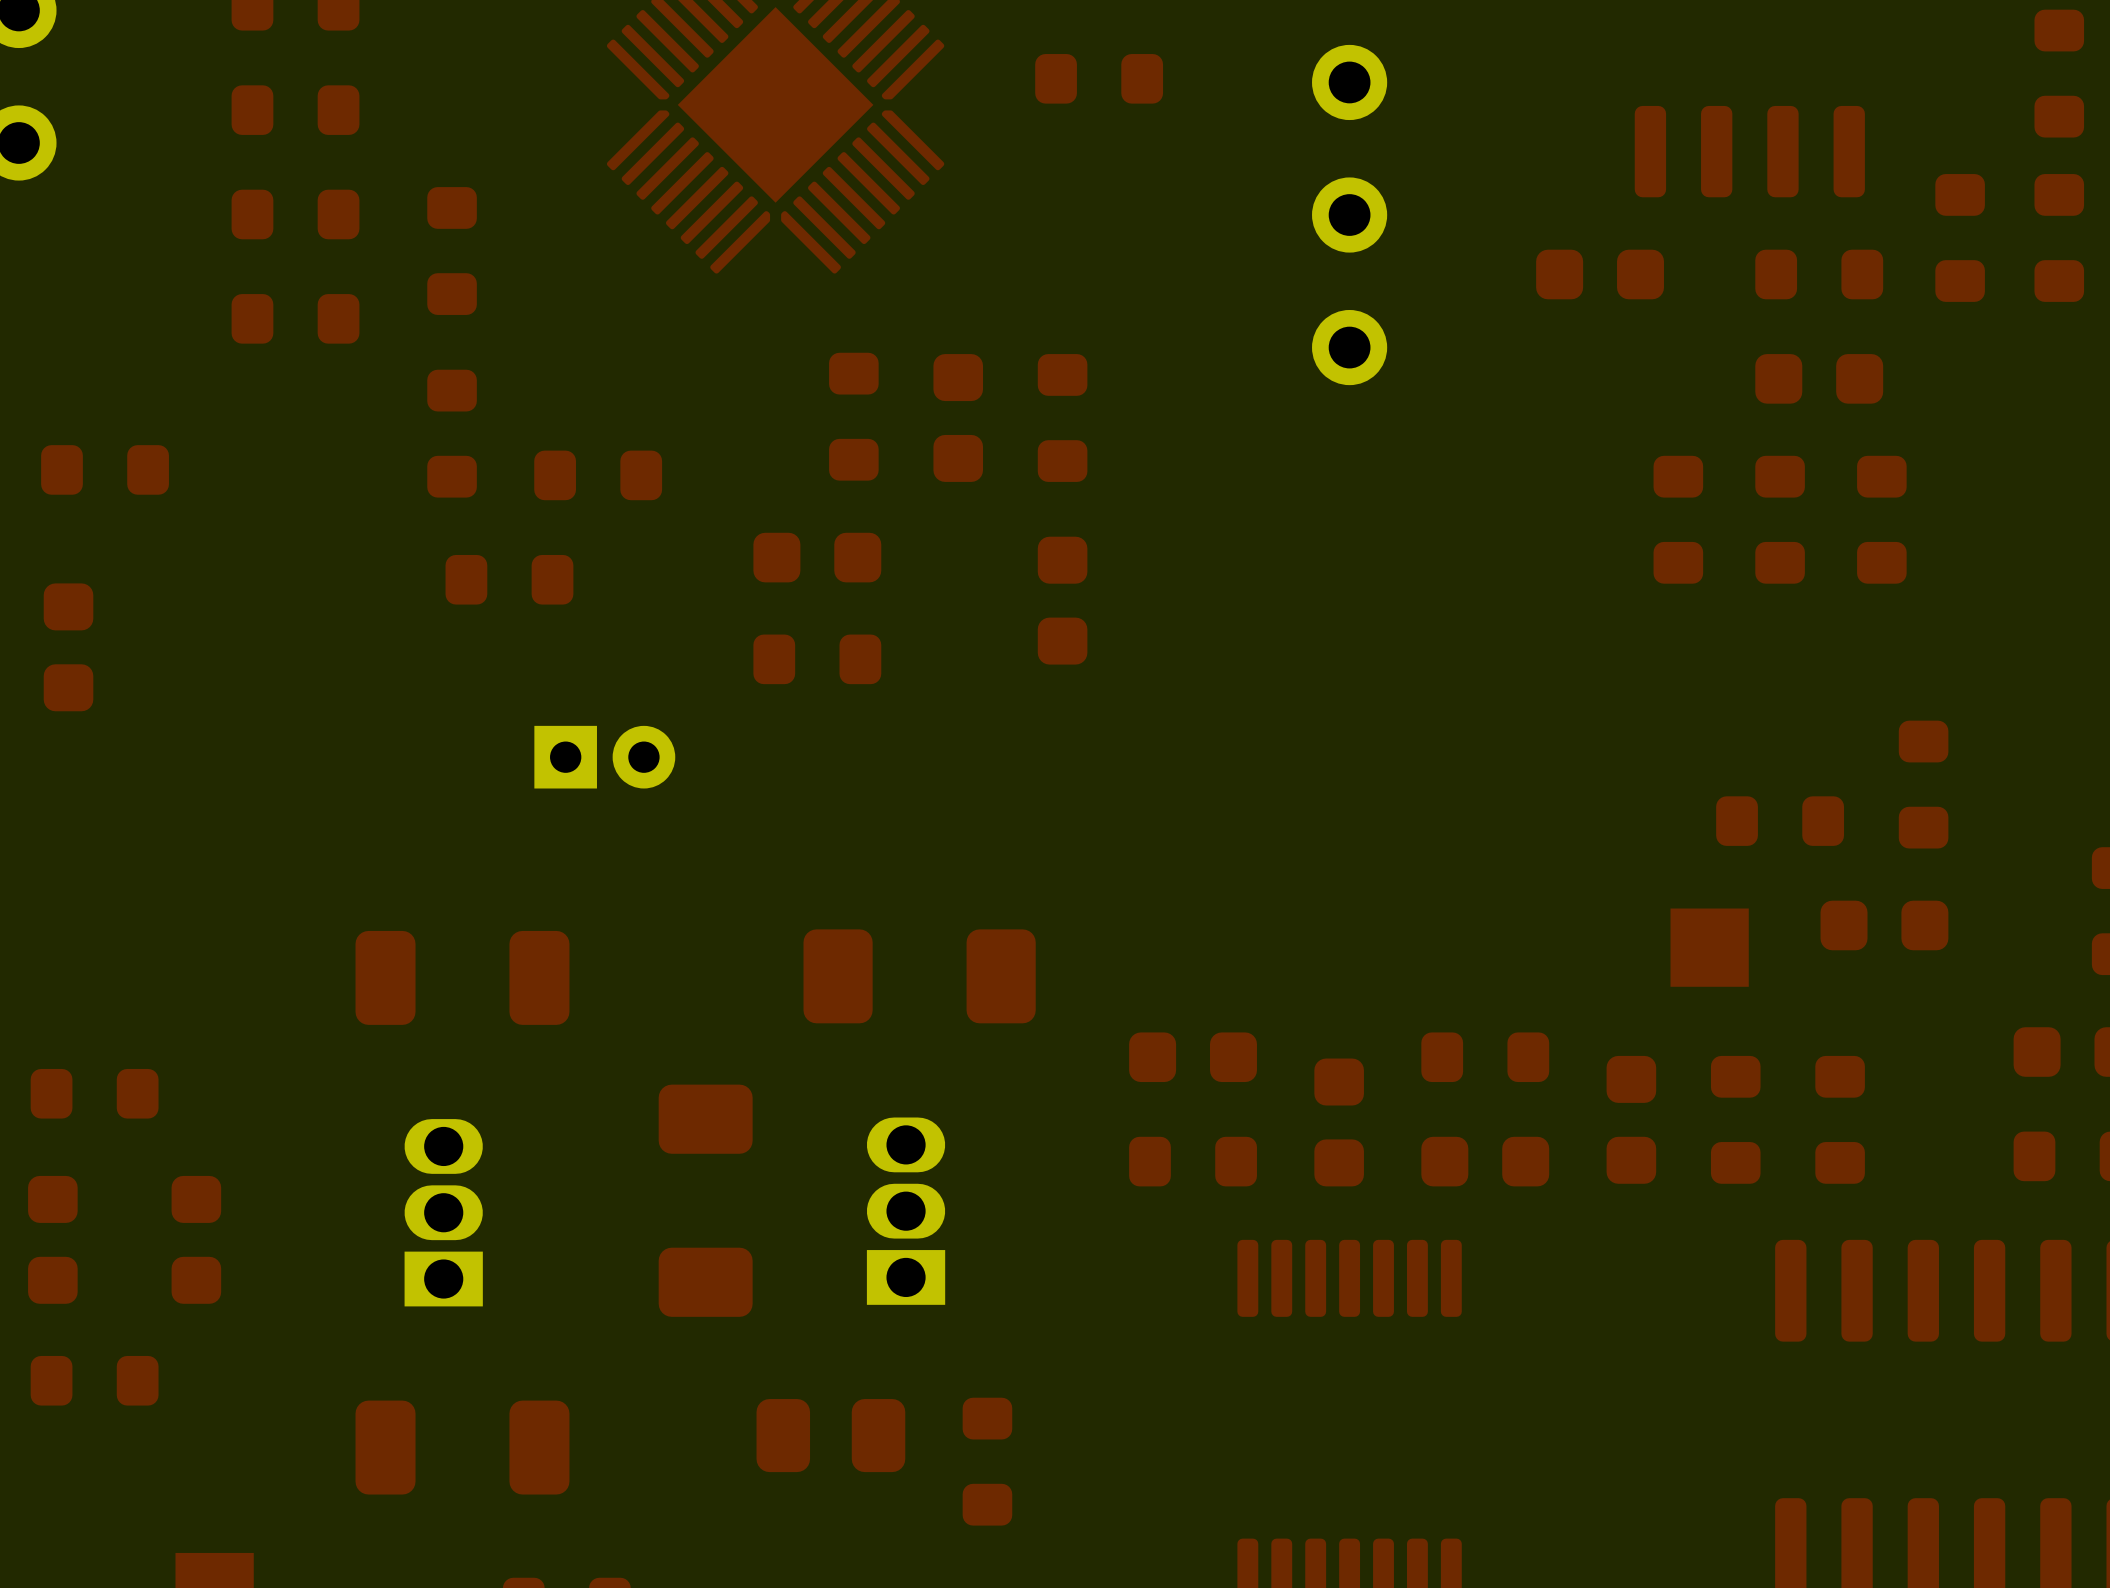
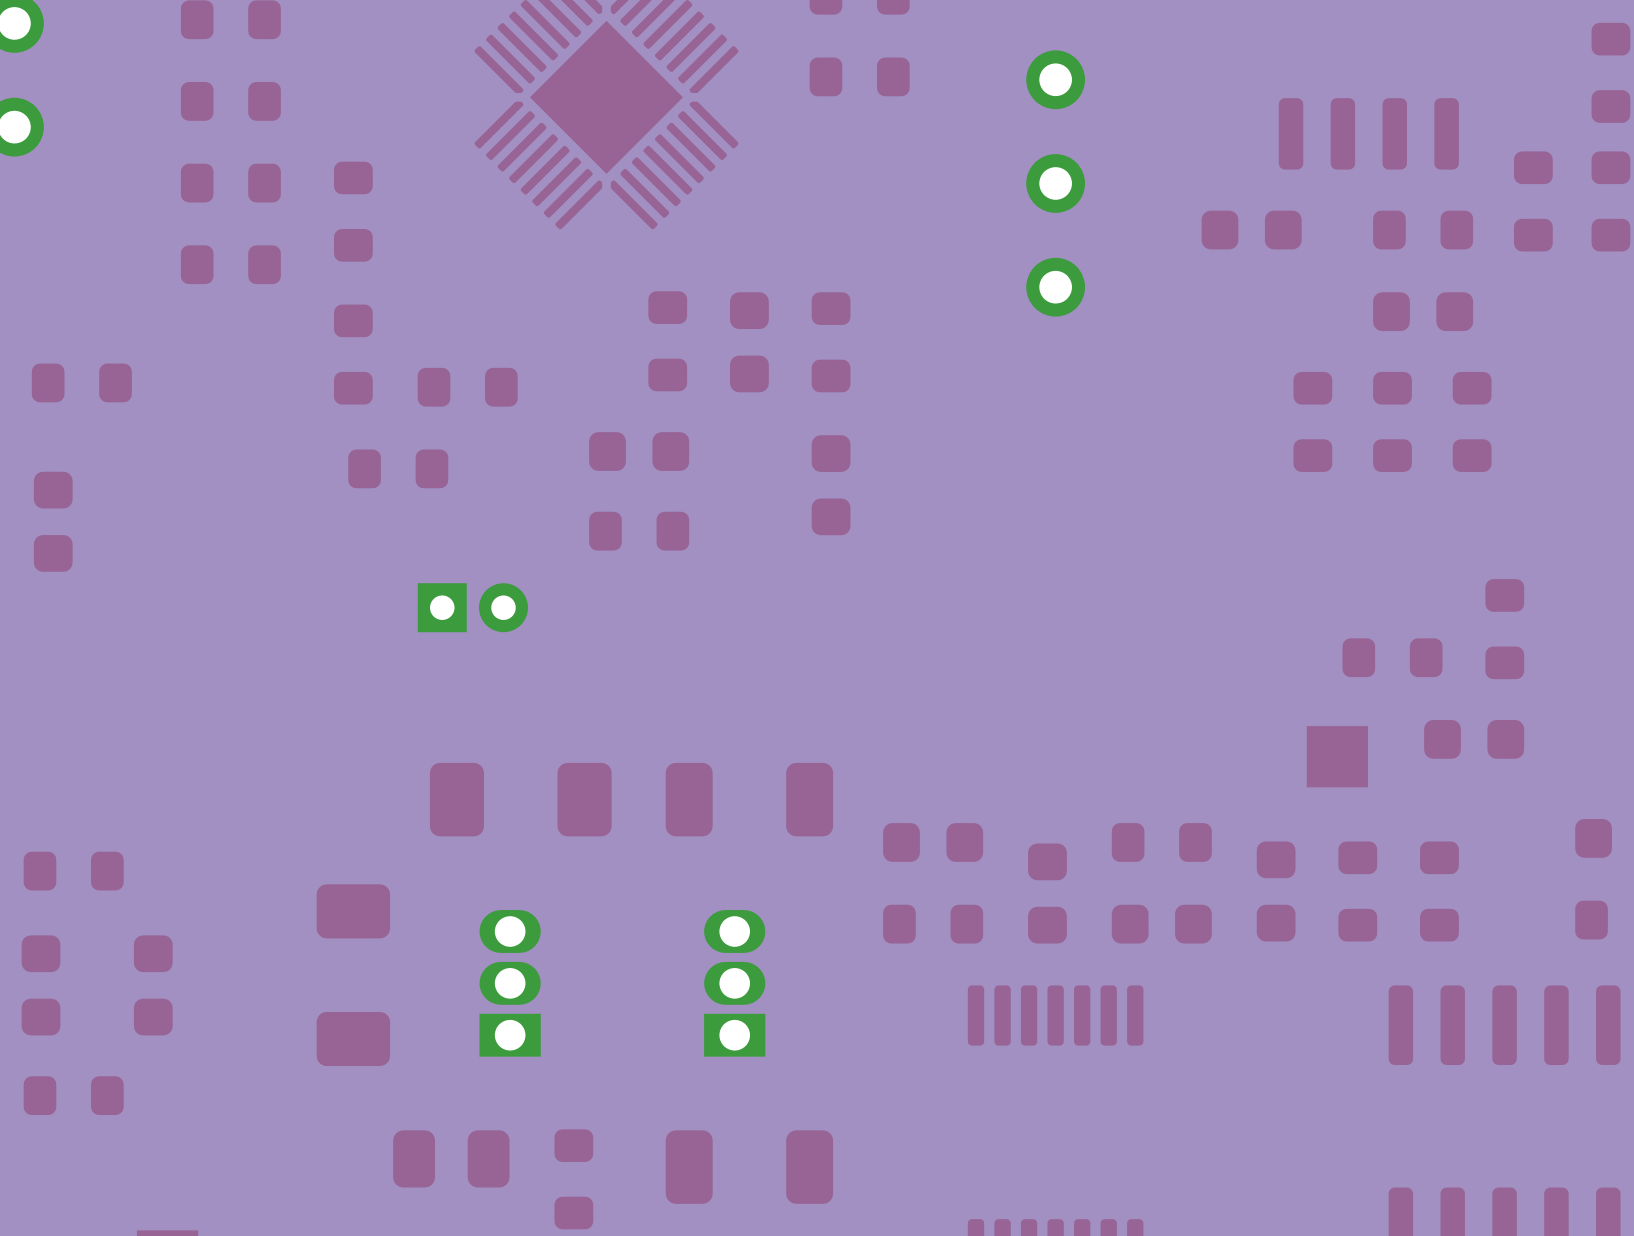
part footprint: [803, 929, 1036, 1024] -> [665, 762, 834, 837]
part: (462, 977) -> none
part footprint: [404, 1119, 483, 1307] -> [316, 884, 391, 1067]
part rotation: 0° (705, 1200) -> 90° clockwise (520, 799)
part position: (705, 1200) -> (520, 799)
part position: (906, 1211) -> (734, 983)
part: none -> (510, 983)
part footprint: [962, 1397, 1013, 1526] -> [665, 1130, 834, 1204]
part position: (830, 1435) -> (451, 1158)
part: (462, 1447) -> none
part: none -> (573, 1179)

